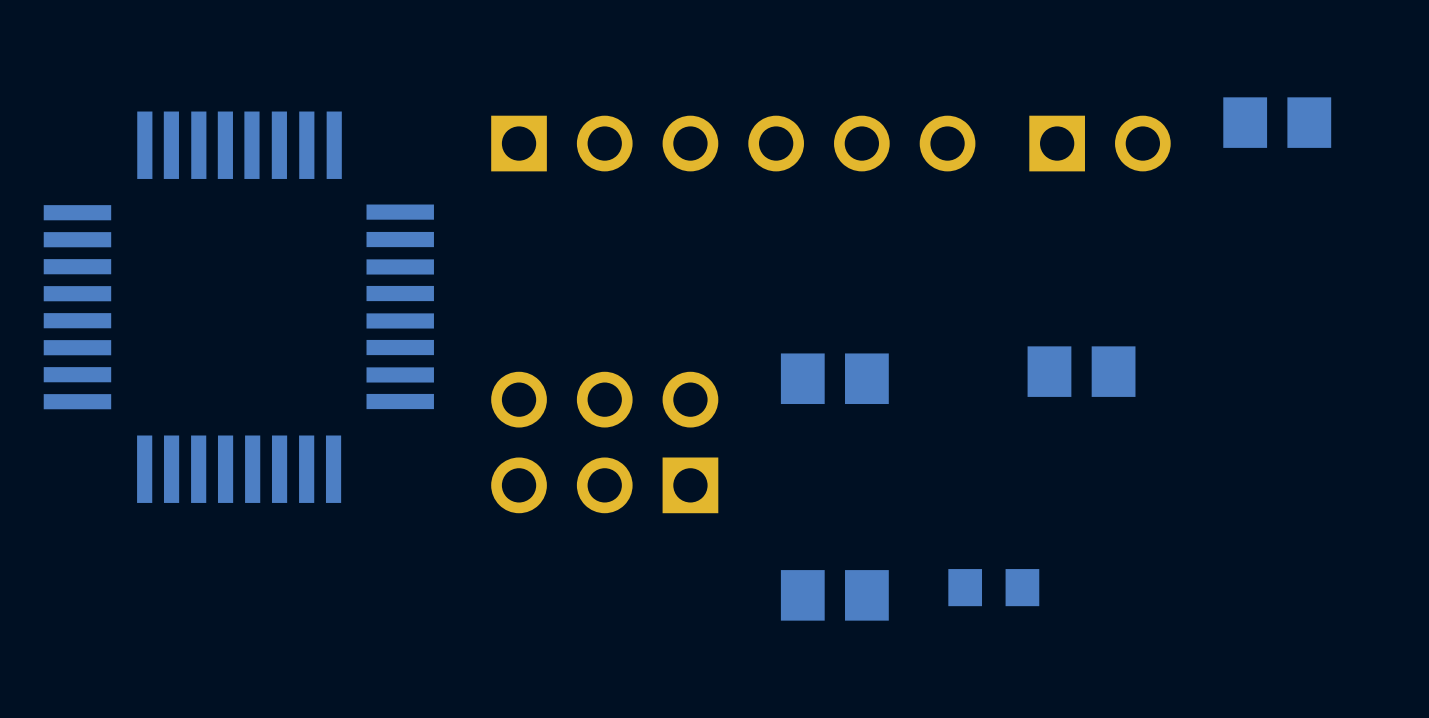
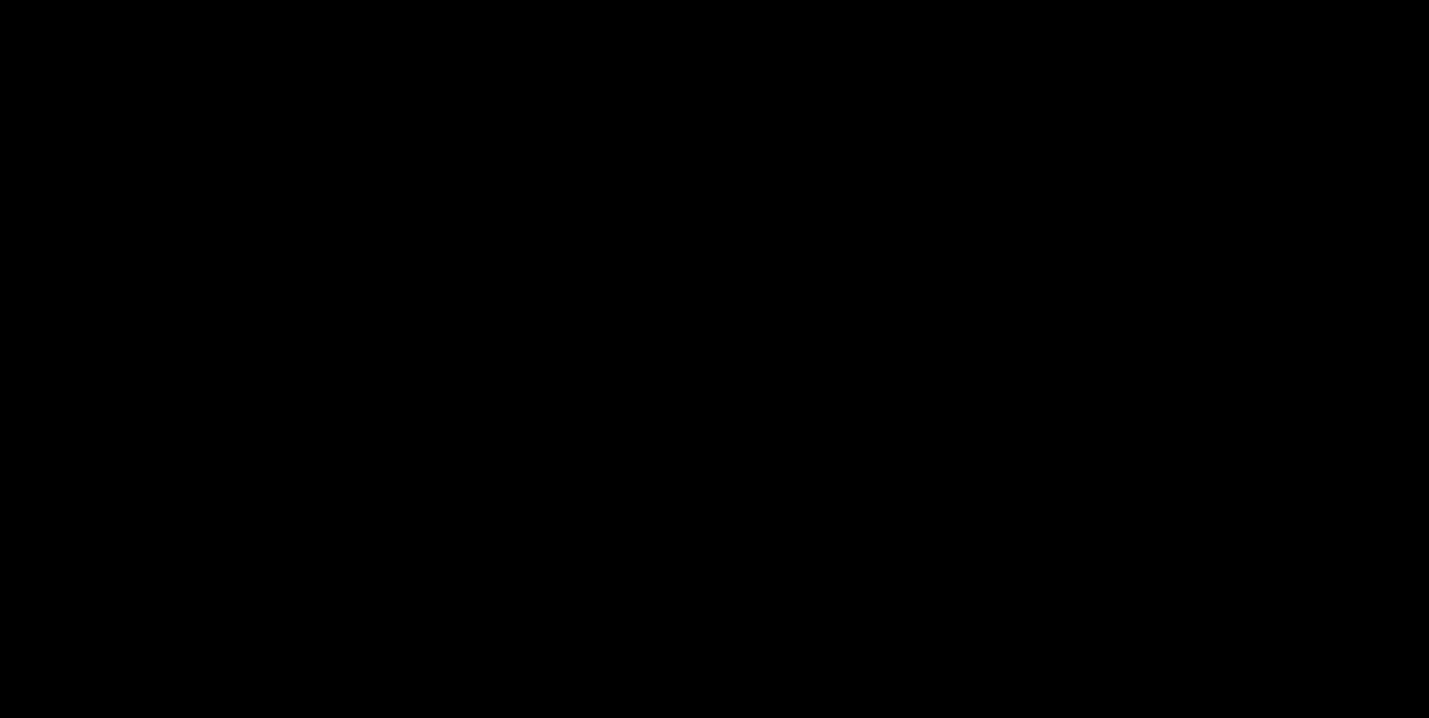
part: (1277, 122) -> none
part: (733, 143) -> none
part: (1100, 143) -> none
part: (238, 307) -> none
part: (1081, 371) -> none
part: (834, 378) -> none
part: (604, 442) -> none
part: (993, 587) -> none
part: (834, 595) -> none

